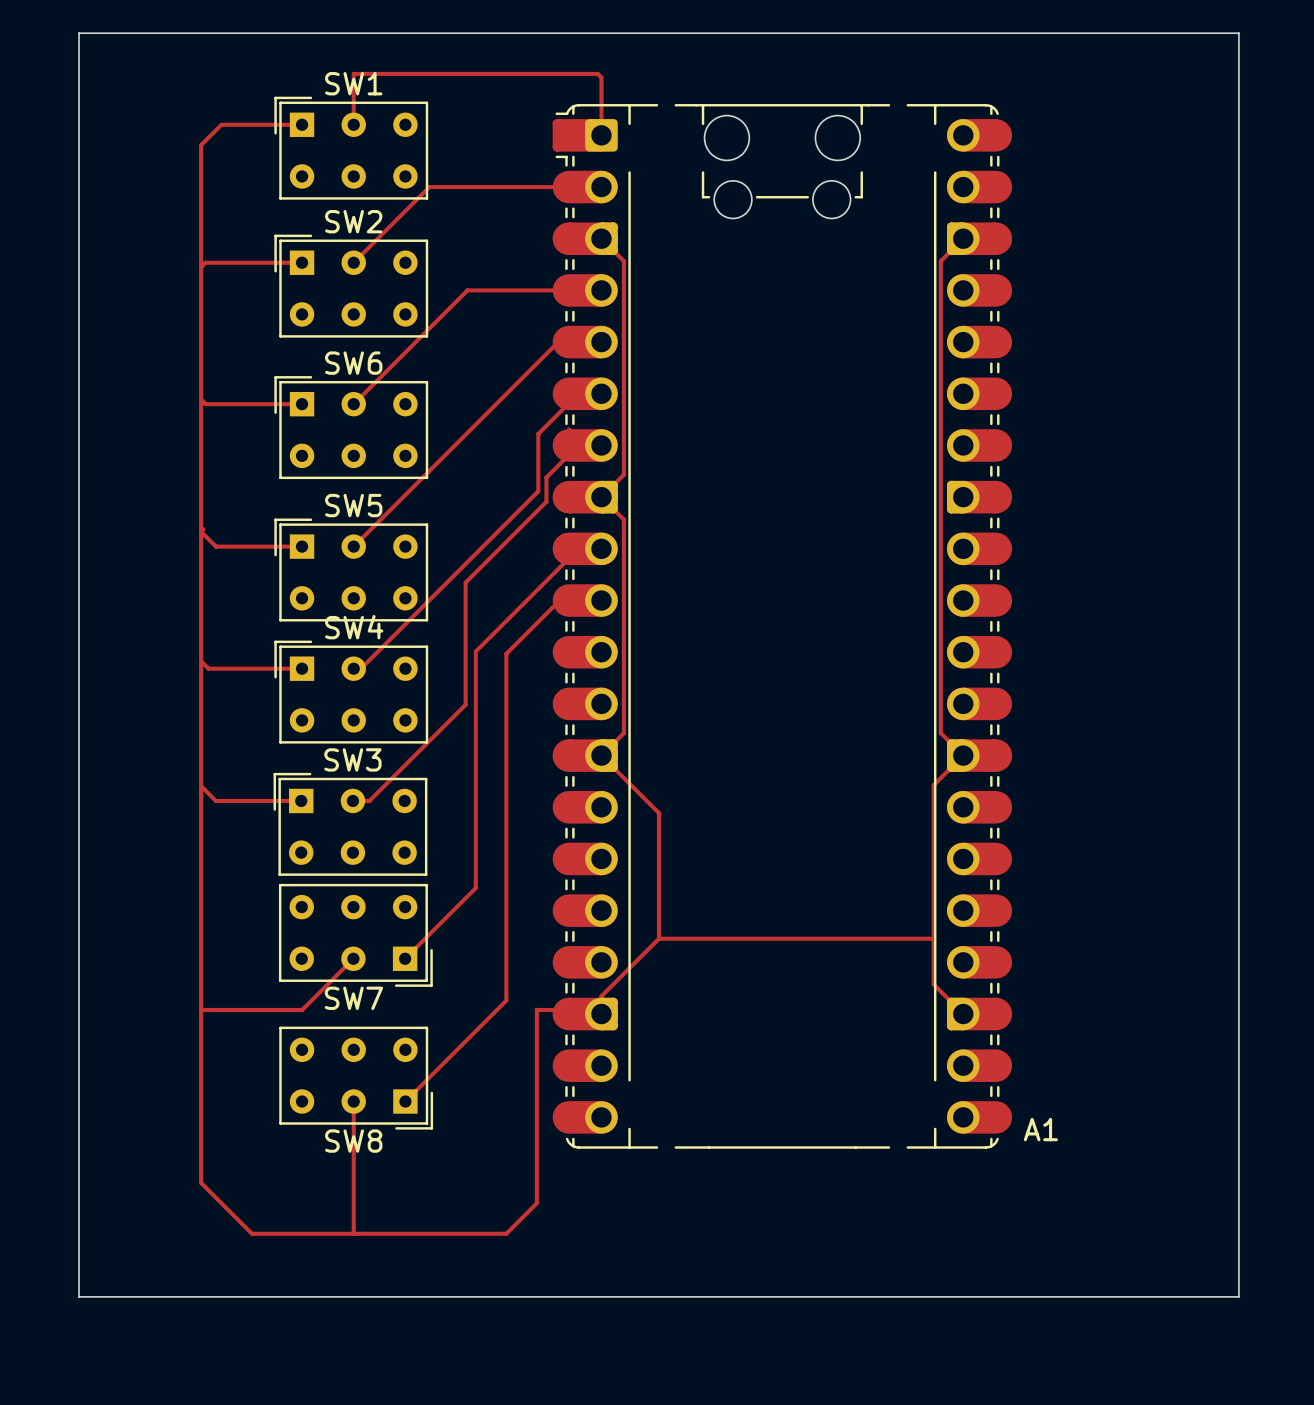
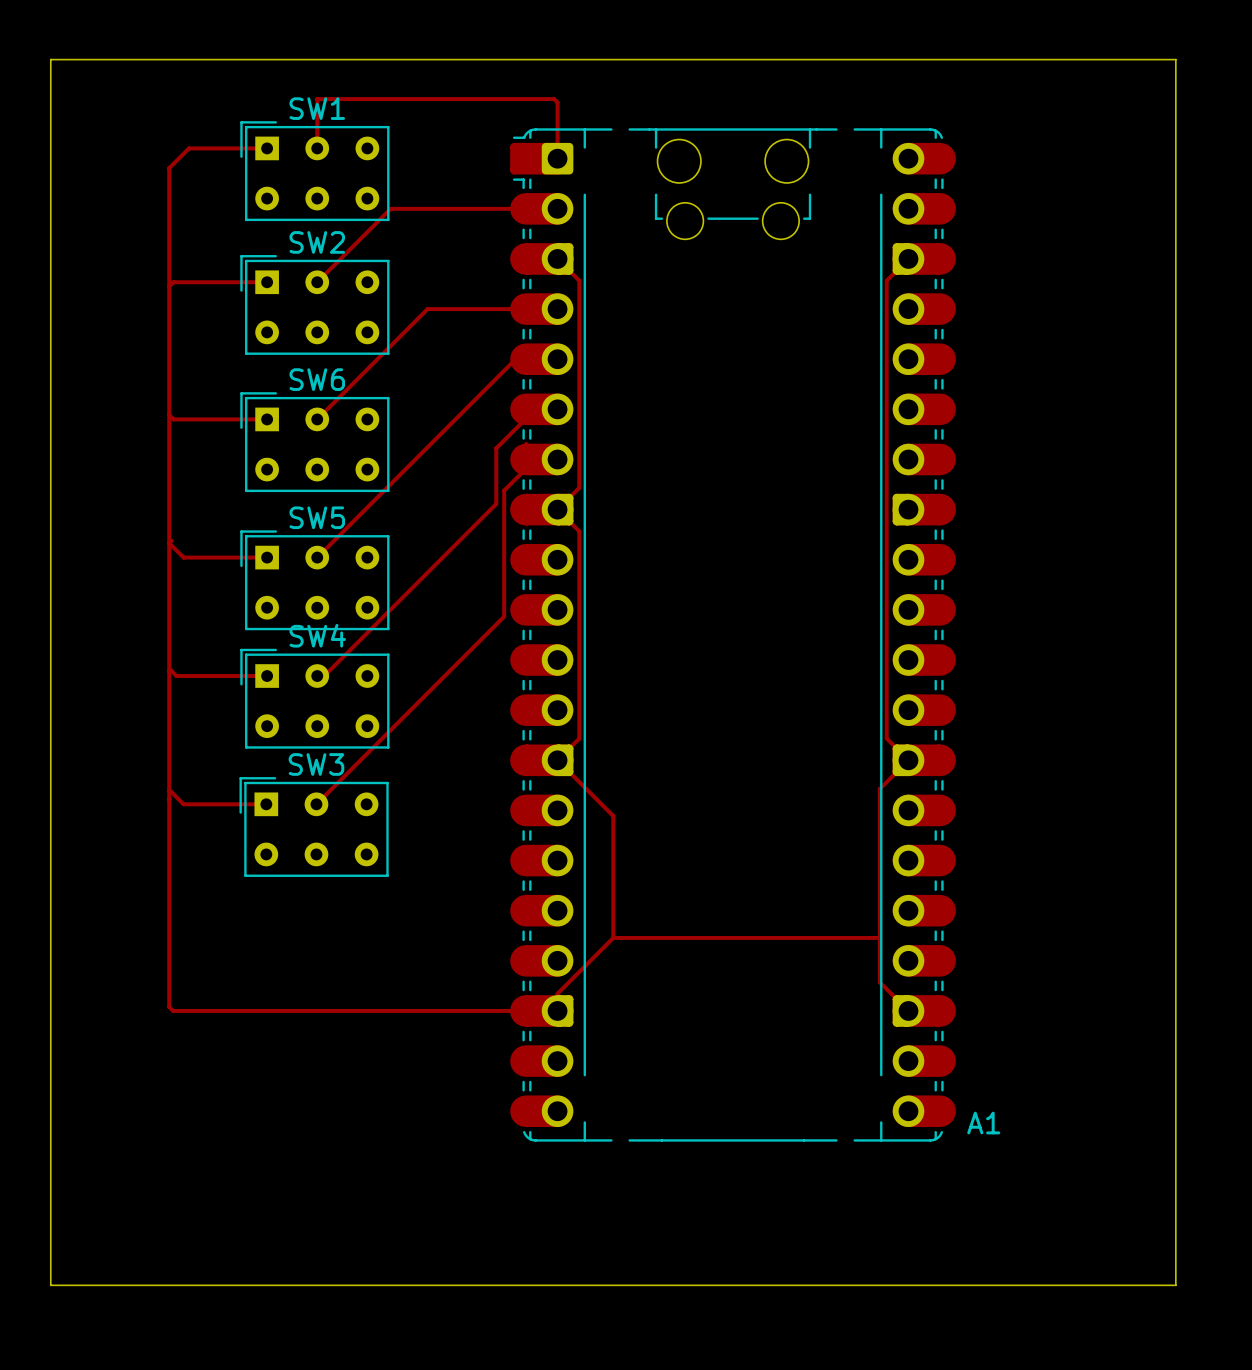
top track: (546, 501) (465, 582) (465, 704) (369, 800) (352, 800) -> (504, 514) (504, 616) (316, 804)
top track: (601, 548) (578, 548) (475, 651) (475, 888) (405, 958) -> none
top track: (601, 600) (559, 600) (506, 653) (506, 1000) (405, 1101) -> none
SW7: (355, 935) -> none
top track: (353, 958) (302, 1009) (201, 1009) (201, 1182) (251, 1233) (506, 1233) (536, 1203) (536, 1009) (597, 1009) (601, 1014) -> (169, 1007) (173, 1010) (557, 1010)
SW8: (356, 1078) -> none
top track: (353, 1101) (353, 1233) -> none

